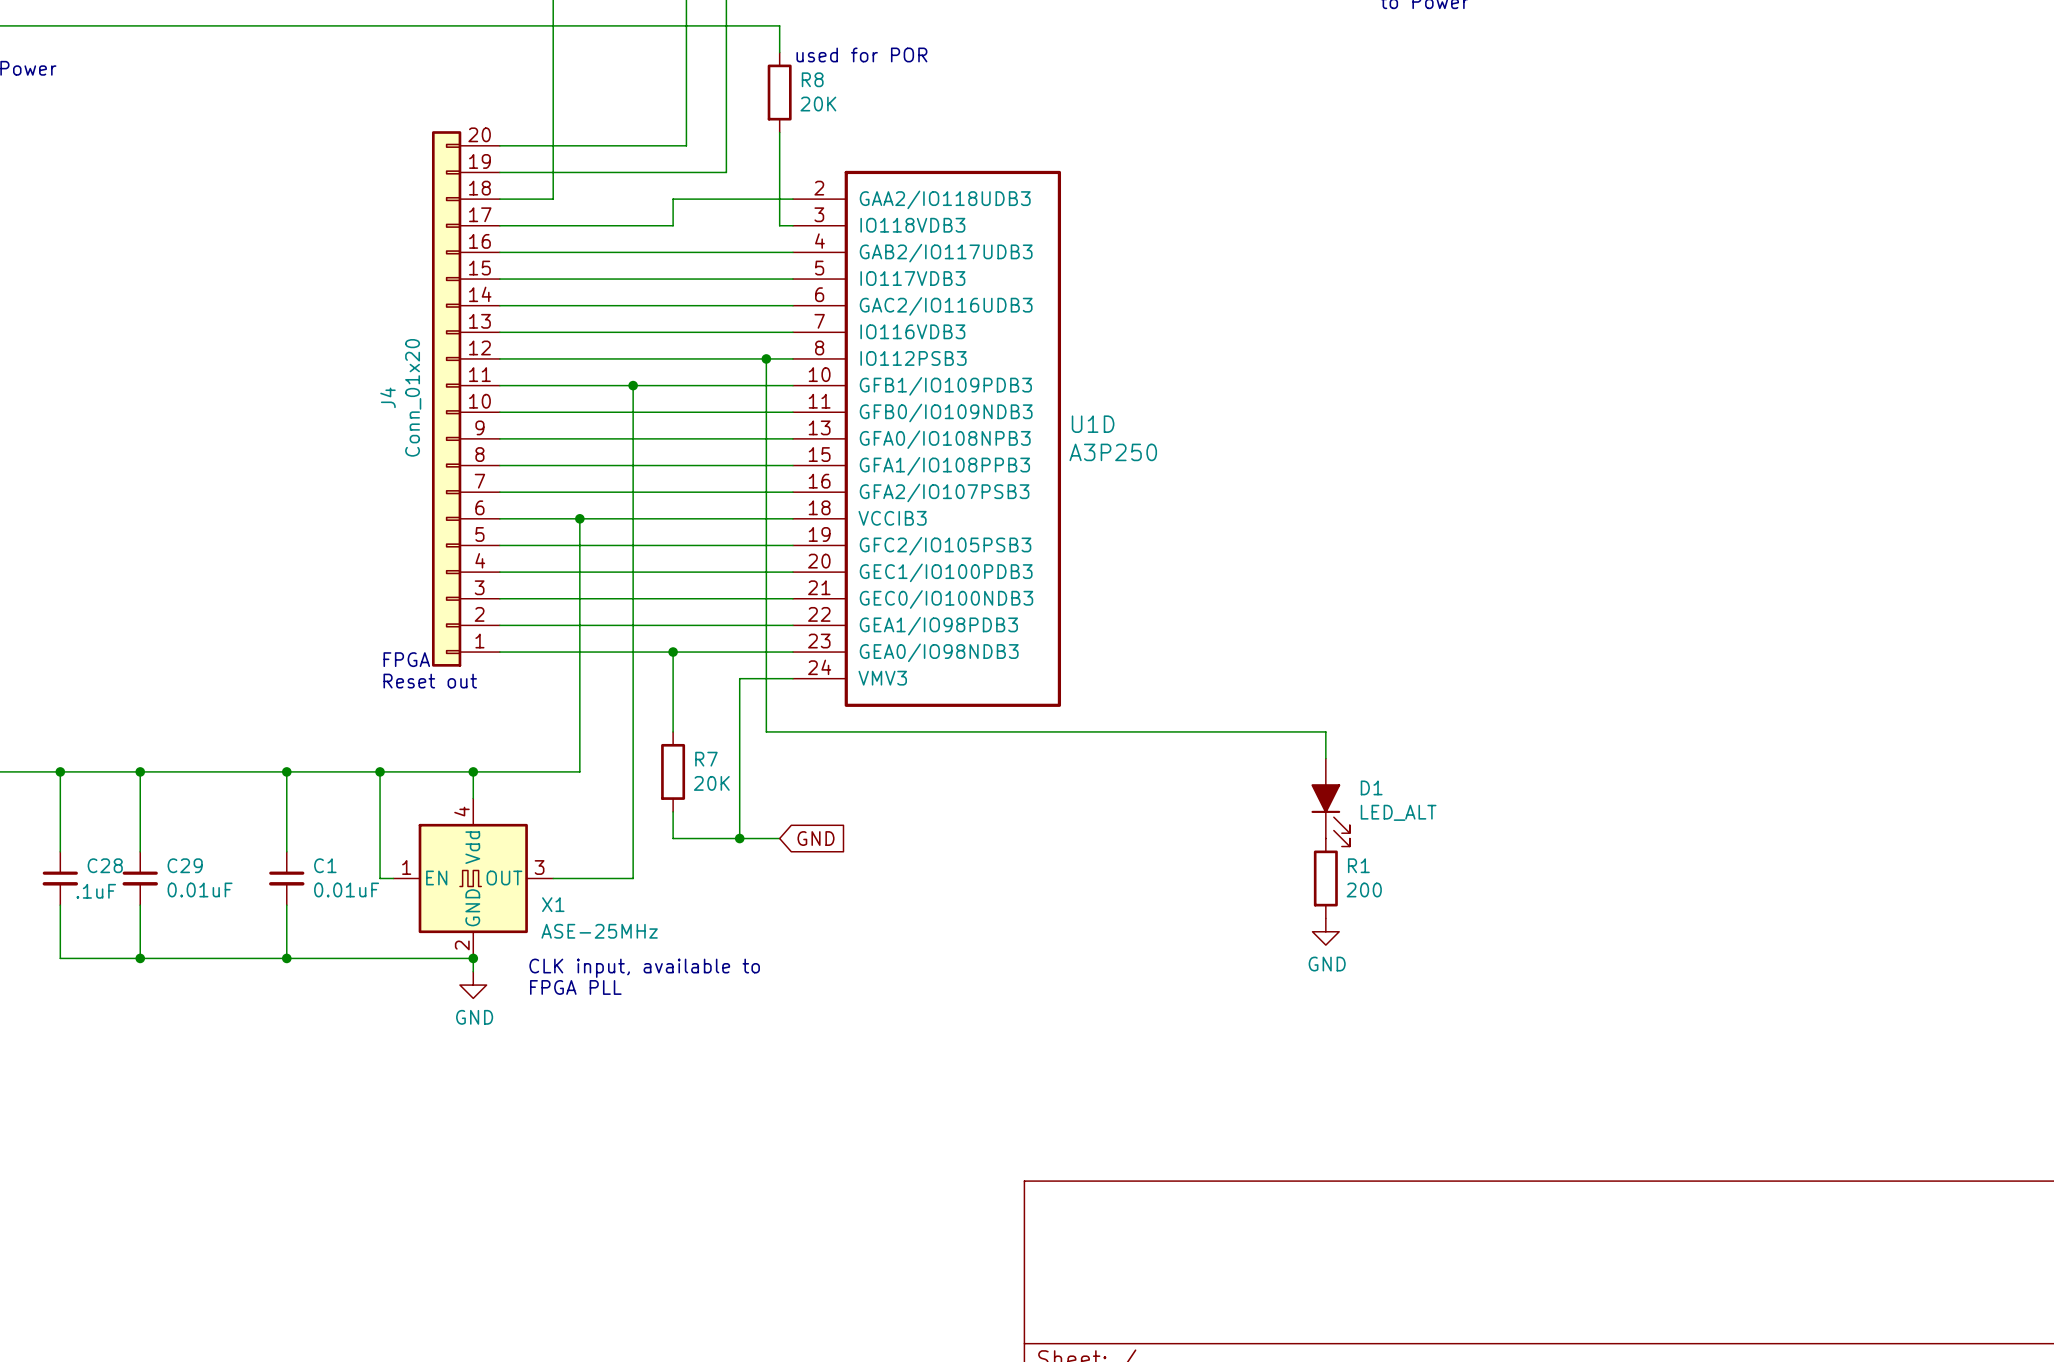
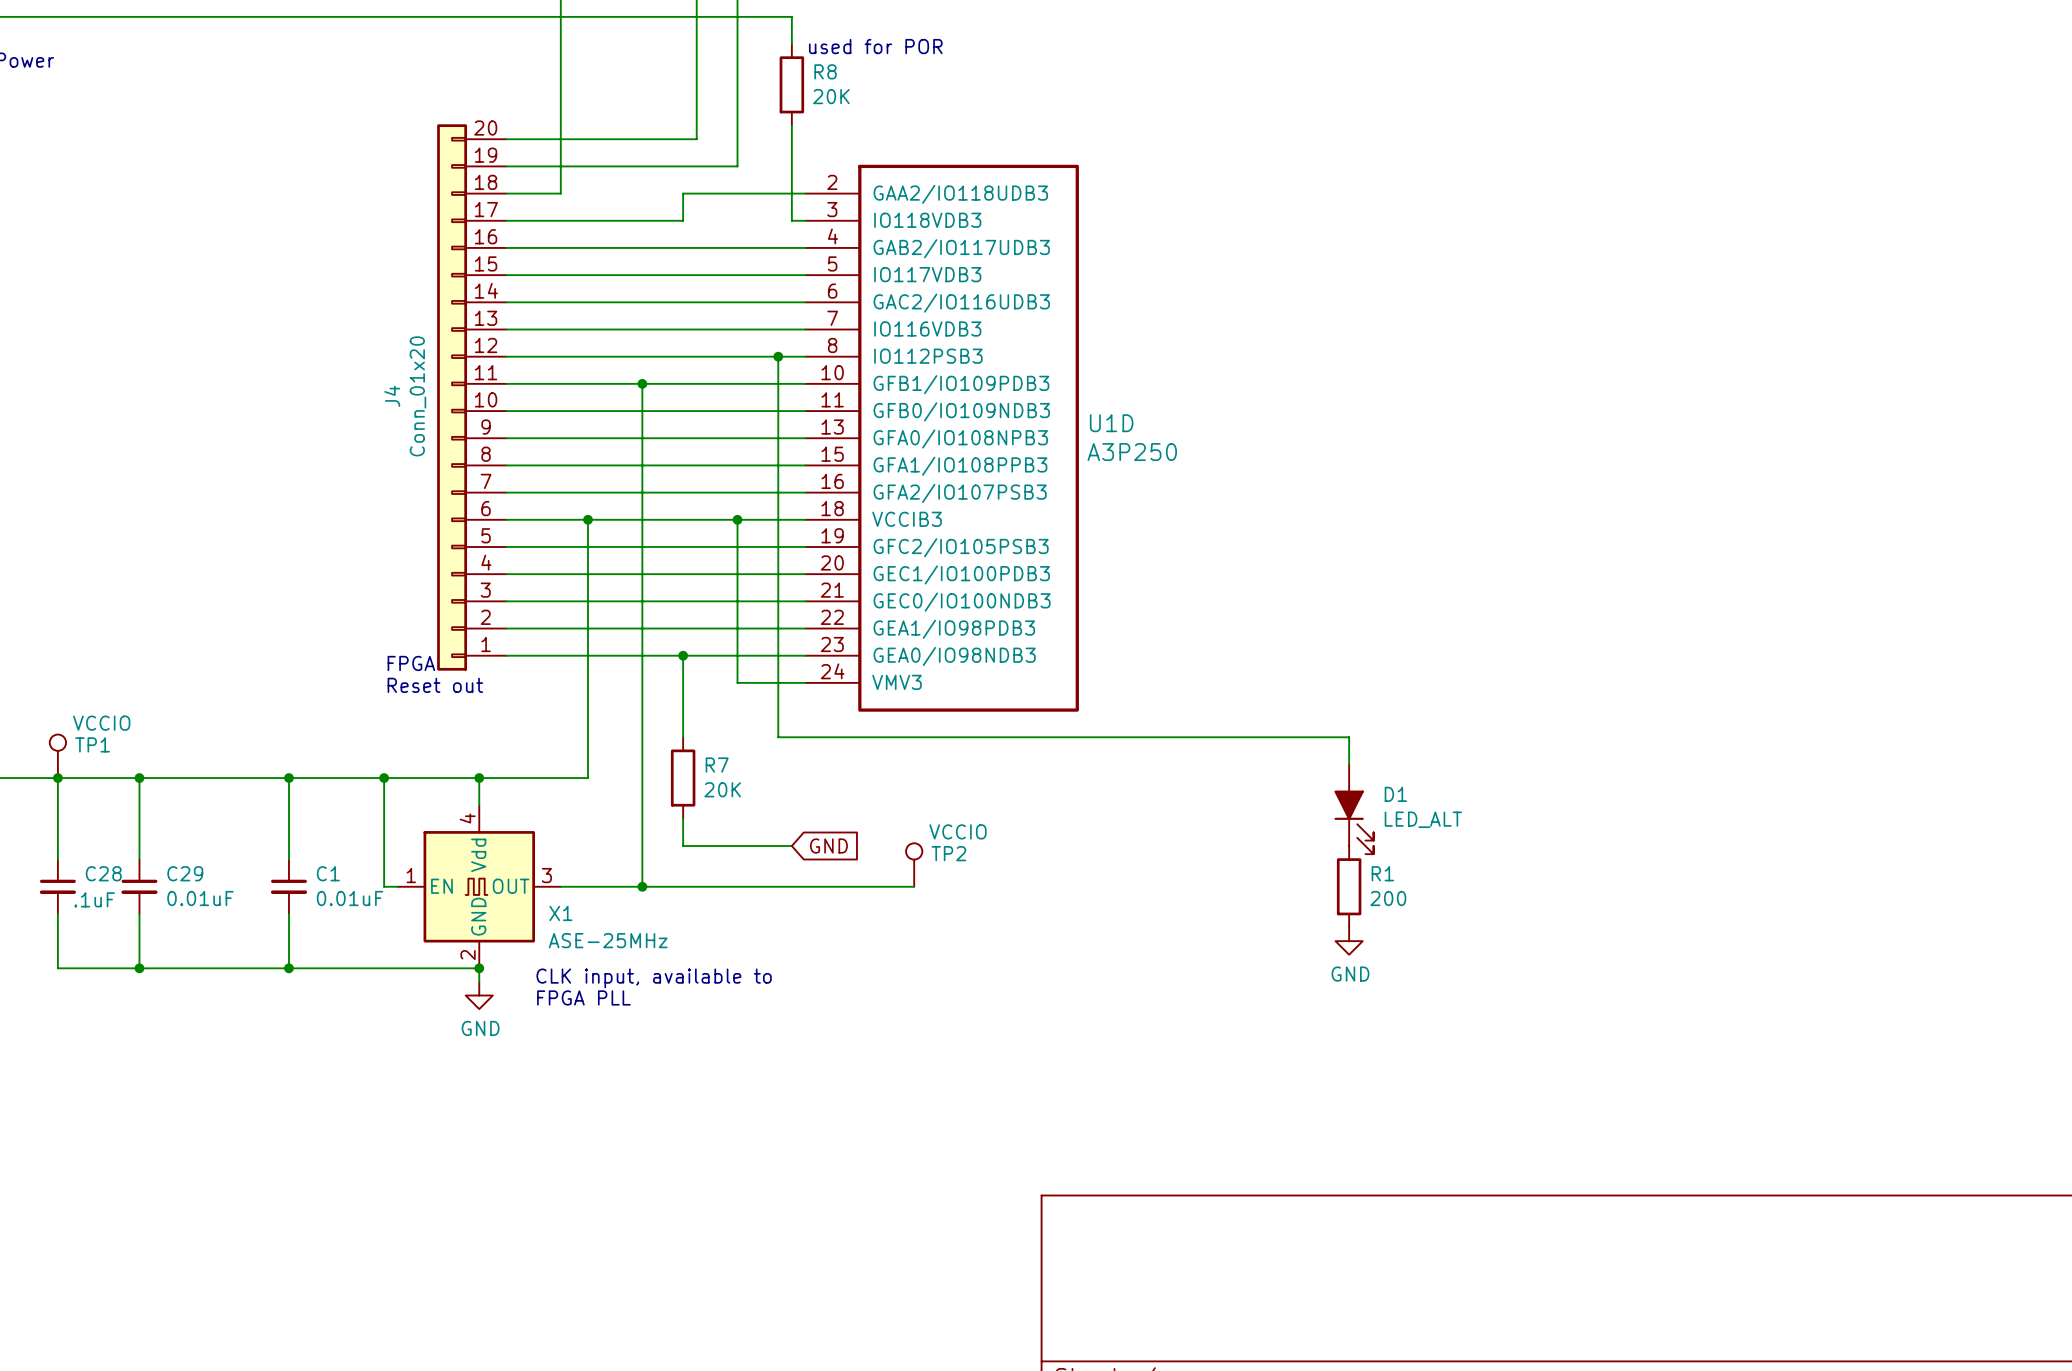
junction: none -> (737, 519)
wire: (739, 678) (739, 838) -> (751, 682) (737, 682) (737, 519)
TP1: none -> VCCIO (57, 756)
junction: (739, 838) -> none
TP2: none -> VCCIO (914, 865)
wire: none -> (642, 886) (914, 886)
junction: none -> (642, 886)

